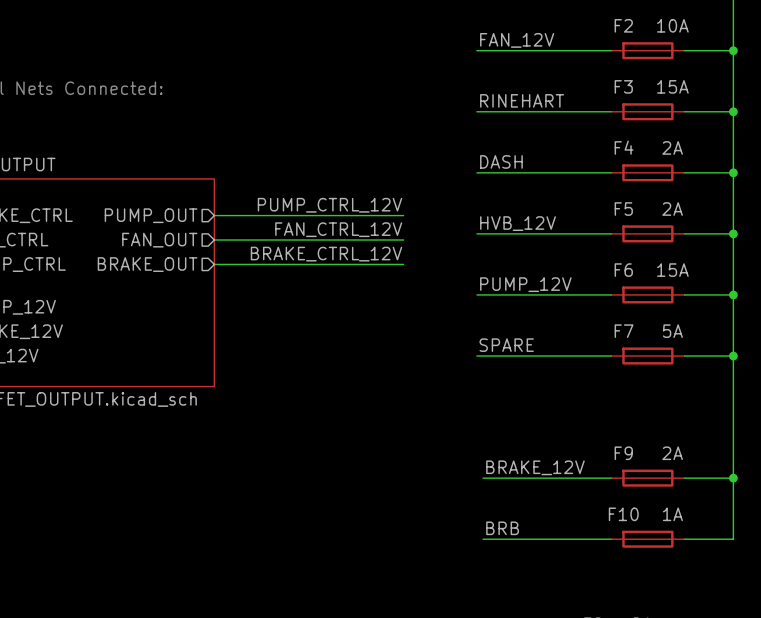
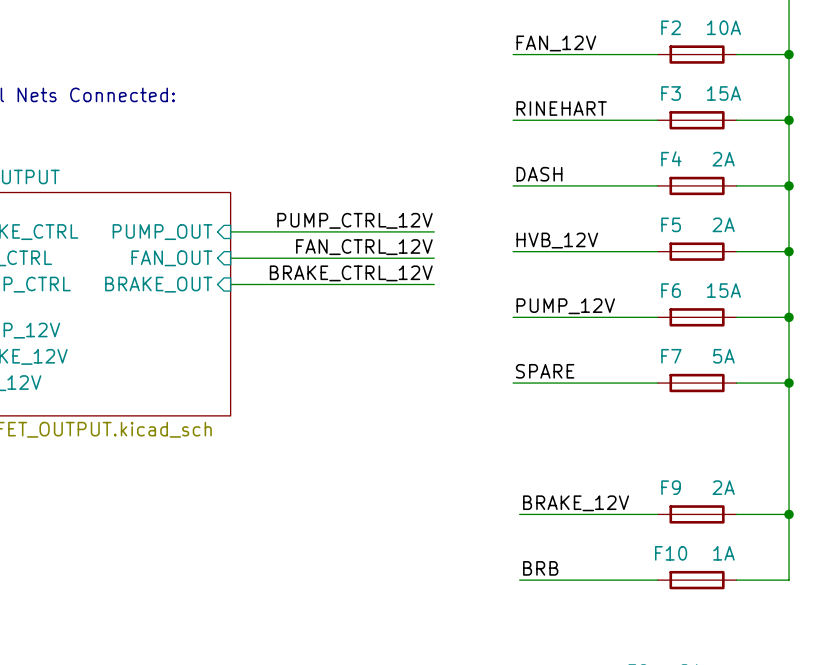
sheet pin shape: output (151, 215) -> input (162, 232)
sheet pin shape: output (159, 240) -> input (171, 258)
sheet pin shape: output (147, 264) -> input (158, 284)

